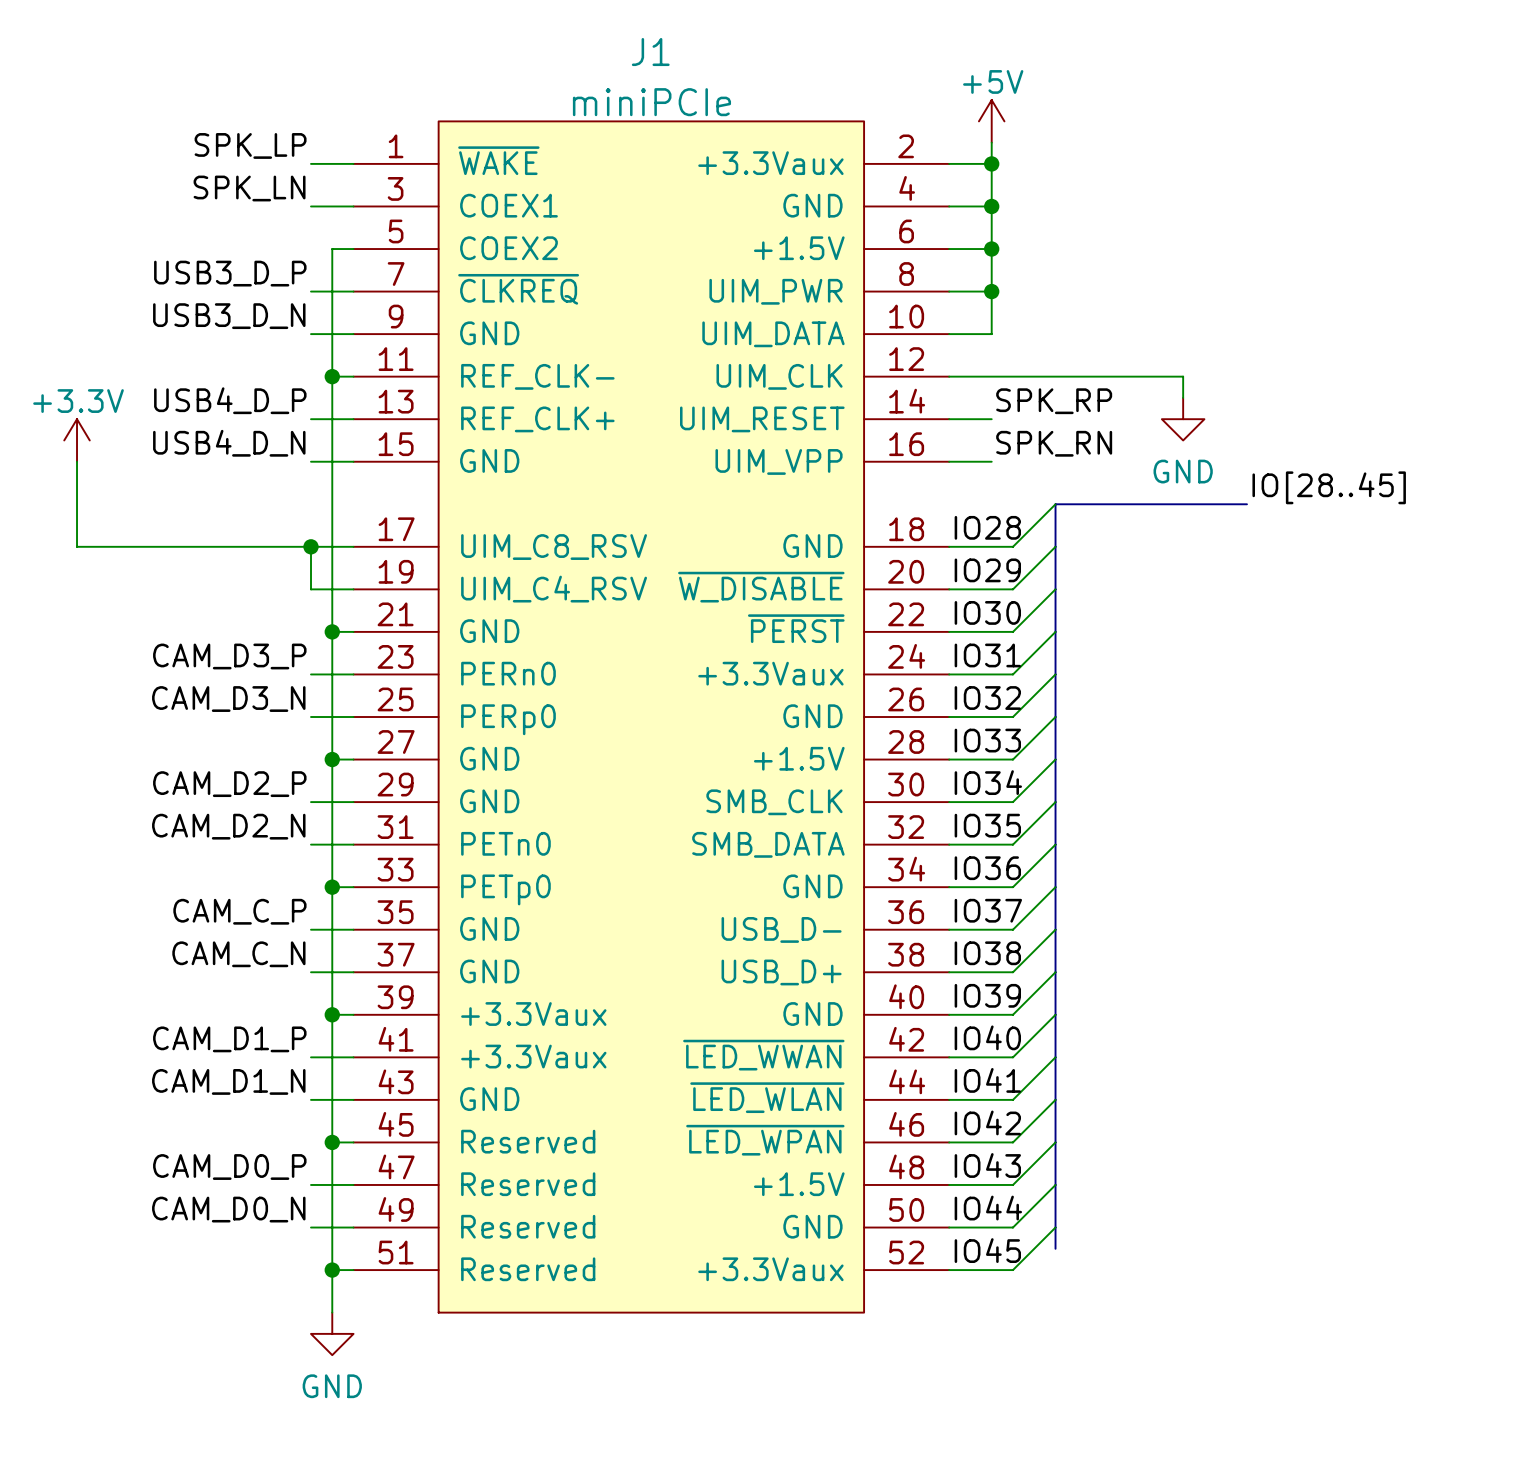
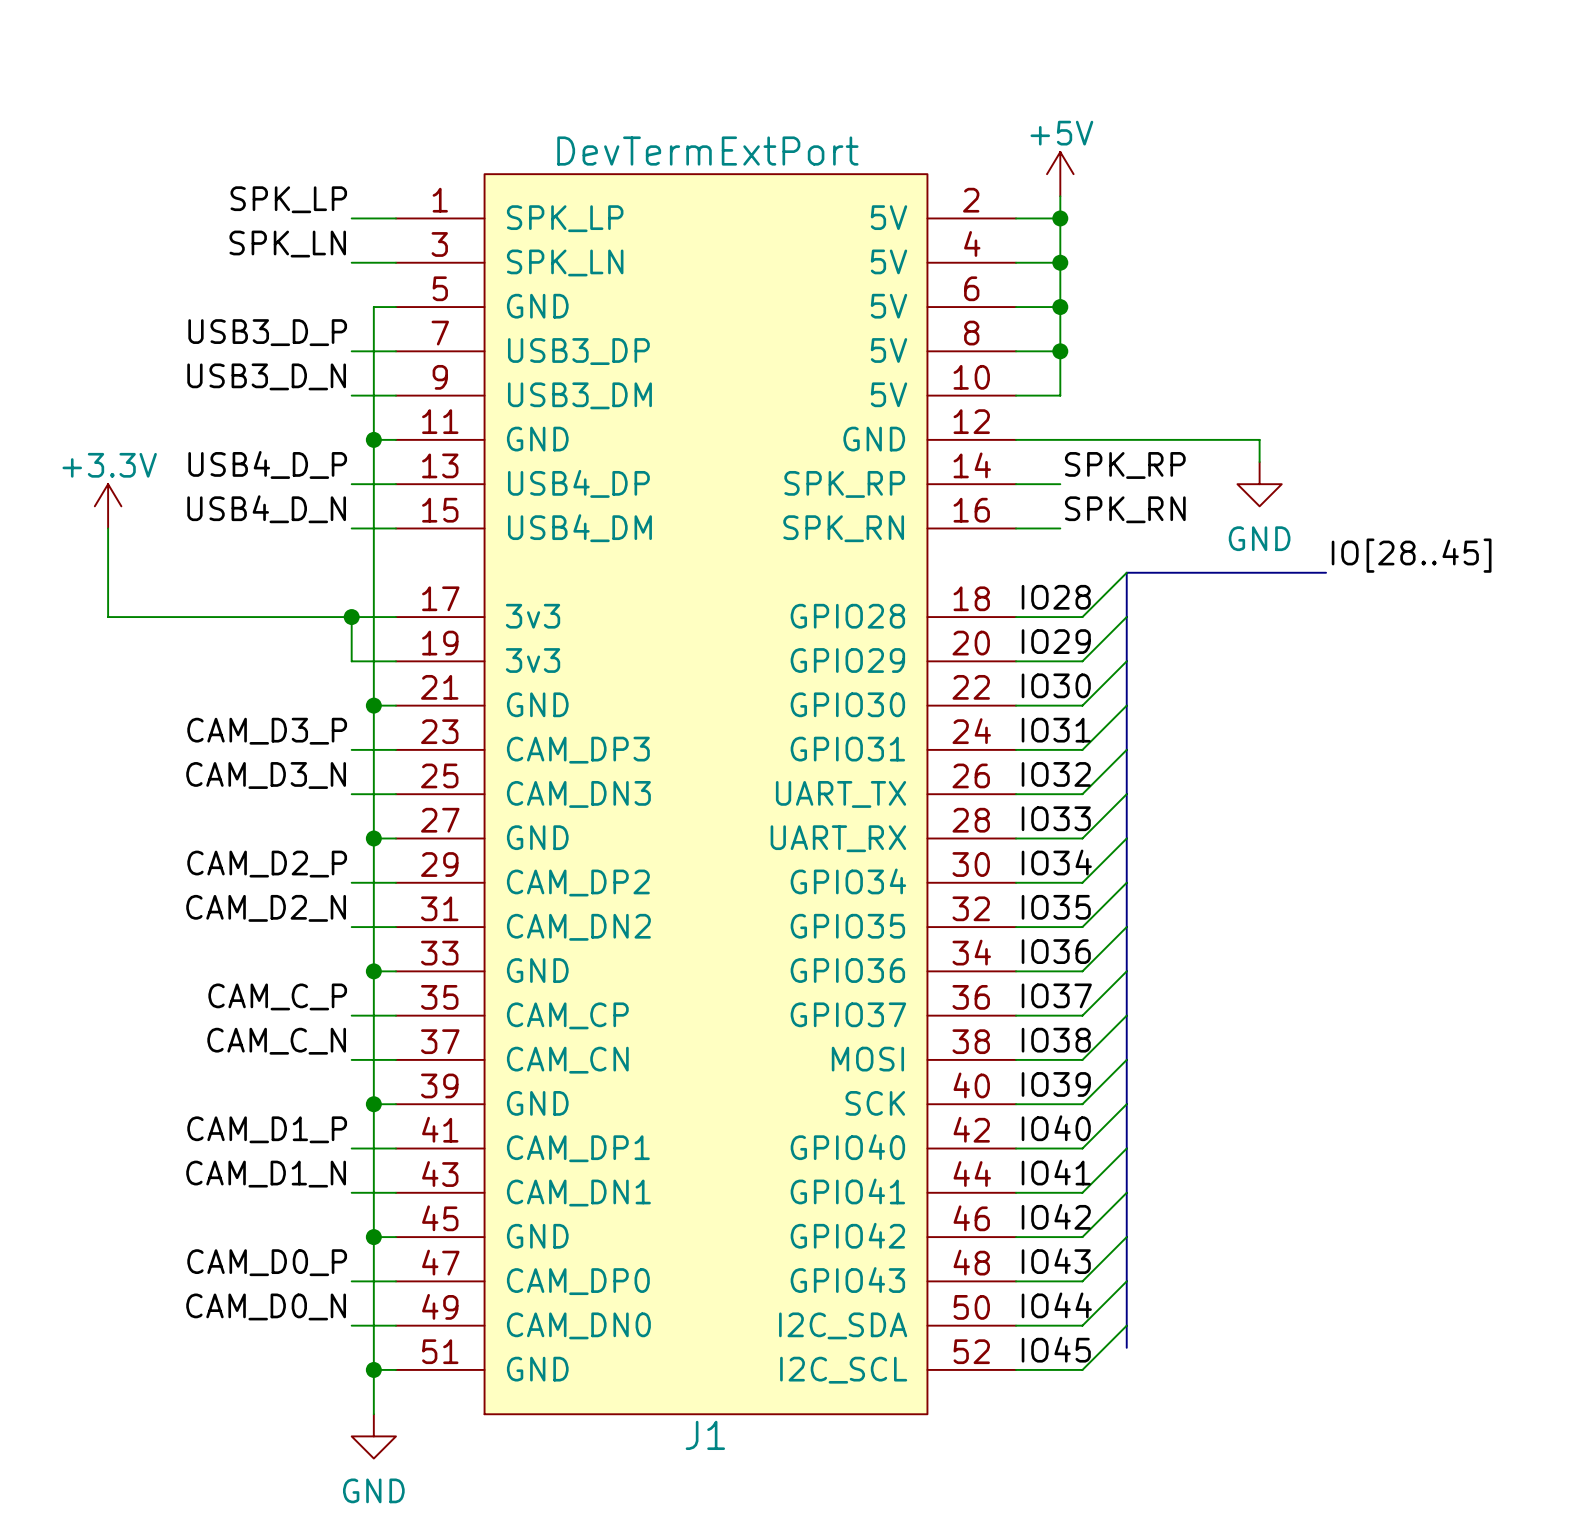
J1 name position: J1 (650, 52) -> J1 (705, 1435)
J1 value: miniPCIe (651, 102) -> DevTermExtPort (707, 151)
J1 symbol: [353, 121, 950, 1313] -> [395, 174, 1017, 1415]

